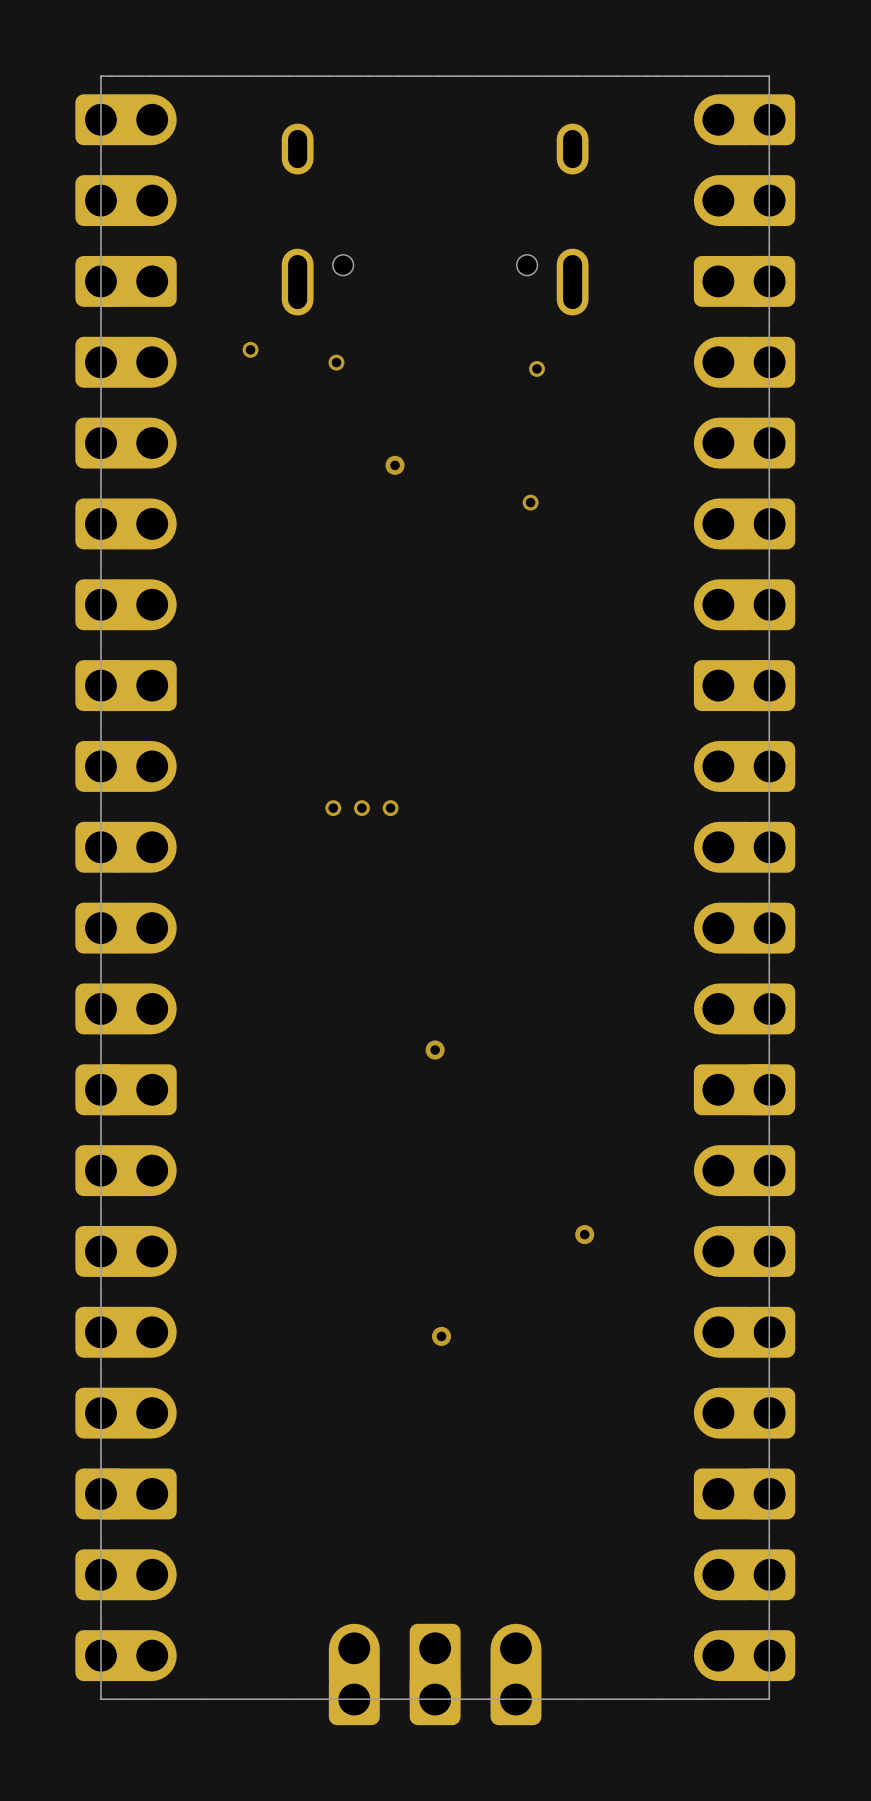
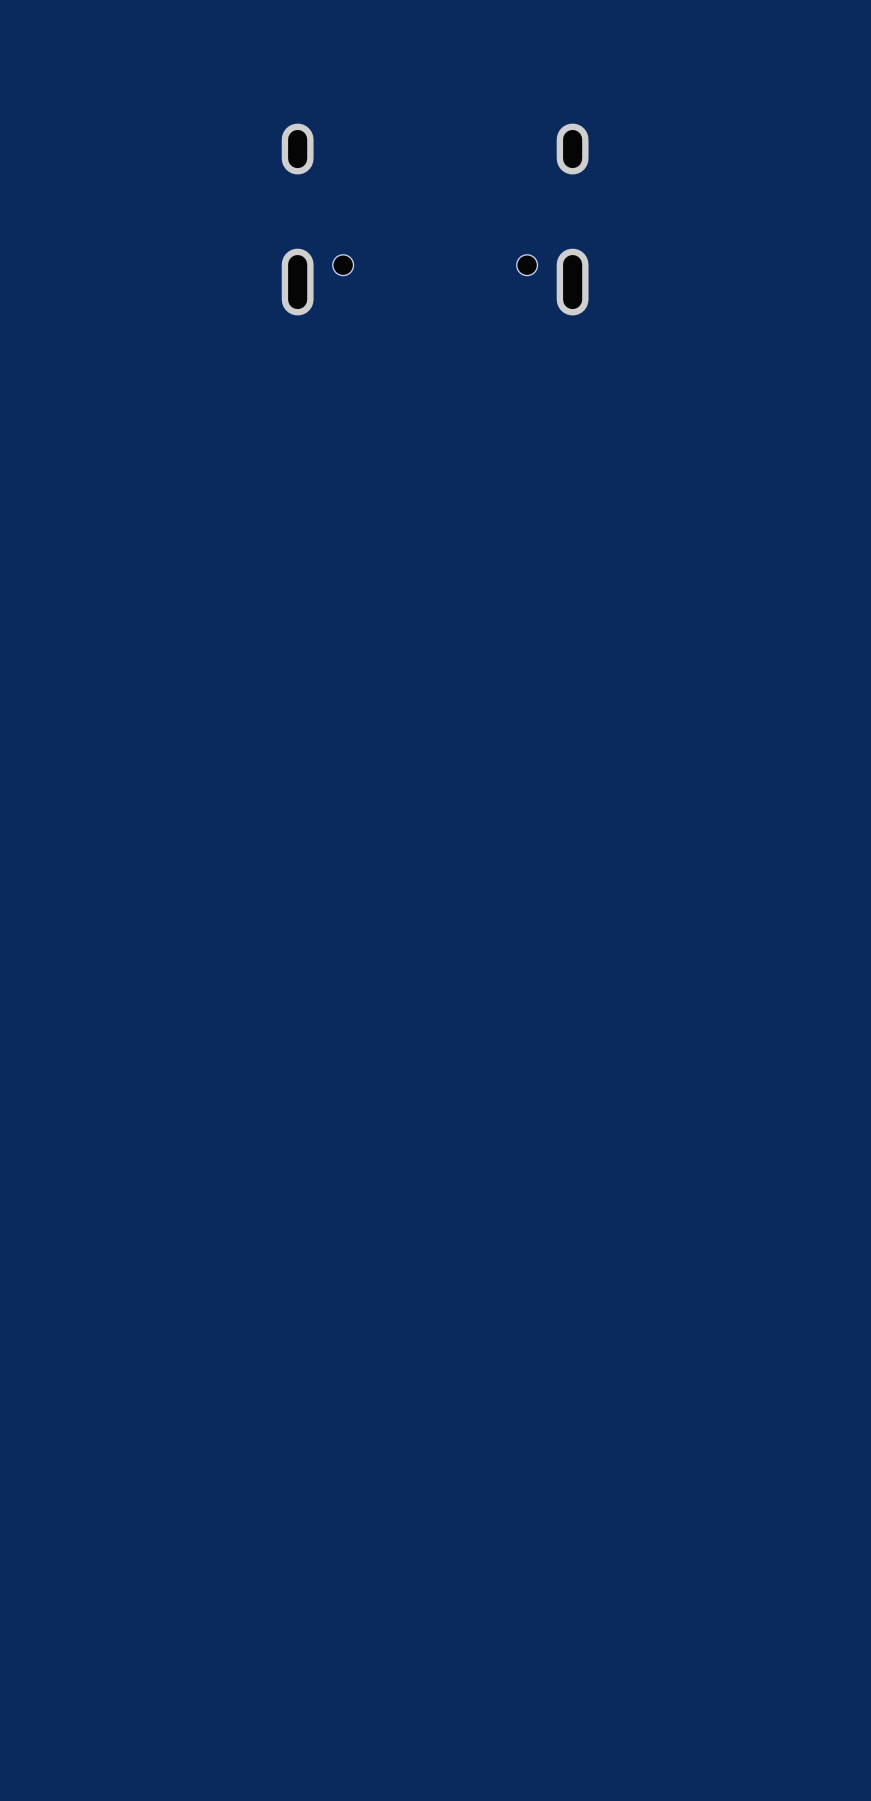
board edge: (769, 76) (769, 1699) (100, 1699) (100, 76) (769, 76) -> none
via: (250, 349) -> none
via: (336, 362) -> none
via: (536, 368) -> none
via: (395, 465) -> none
via: (530, 502) -> none
via: (333, 808) -> none
via: (361, 808) -> none
via: (390, 808) -> none
part: (126, 887) -> none
part: (744, 887) -> none
via: (435, 1049) -> none
via: (584, 1234) -> none
via: (441, 1336) -> none
part: (435, 1674) -> none

